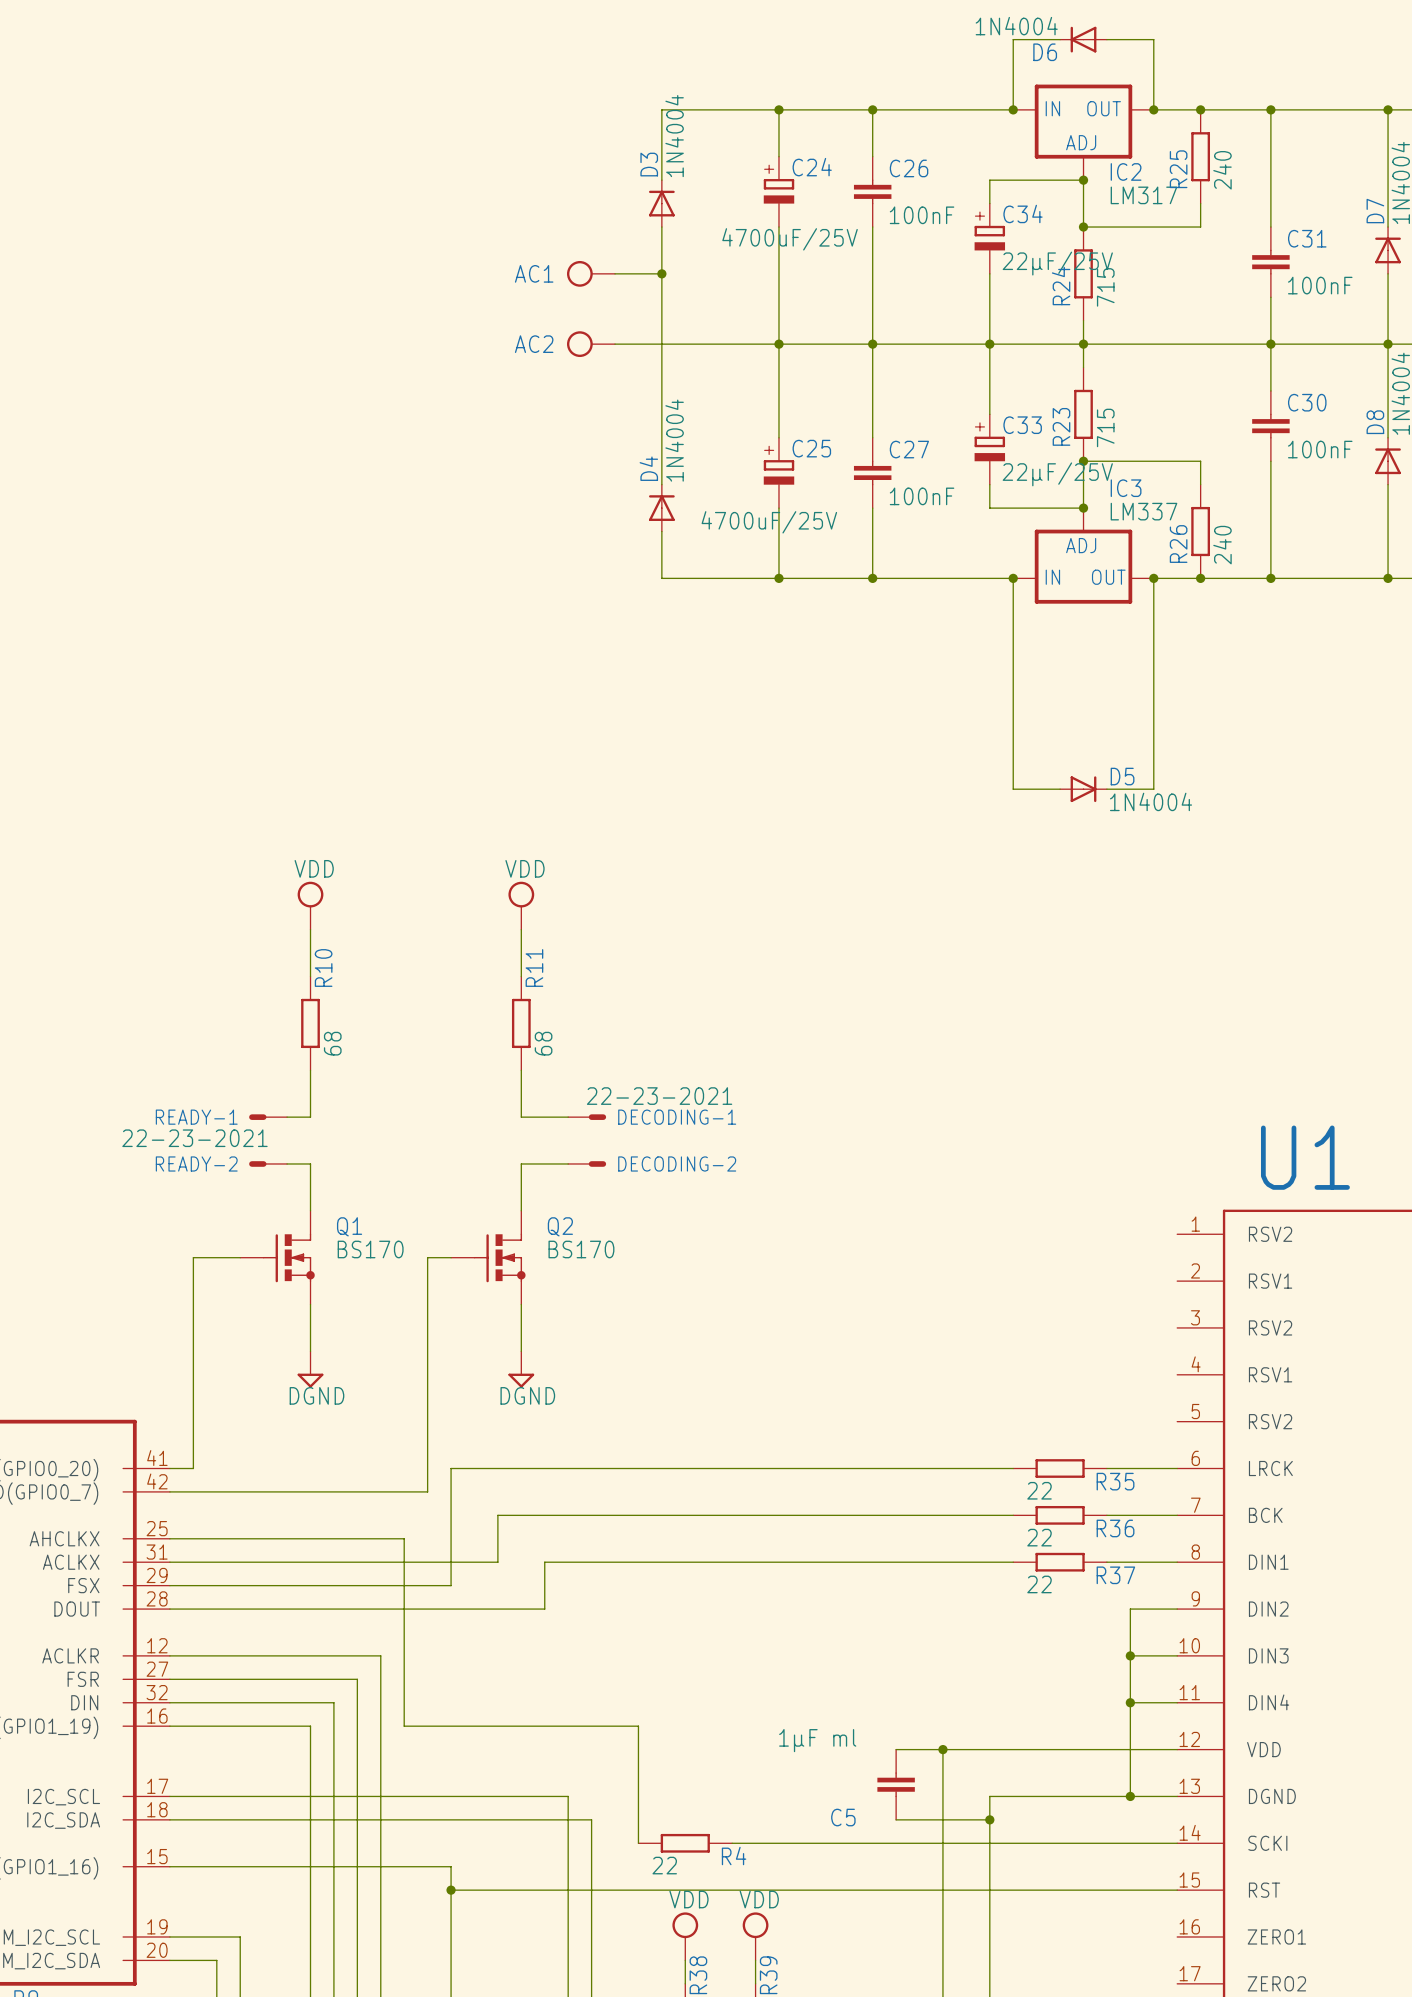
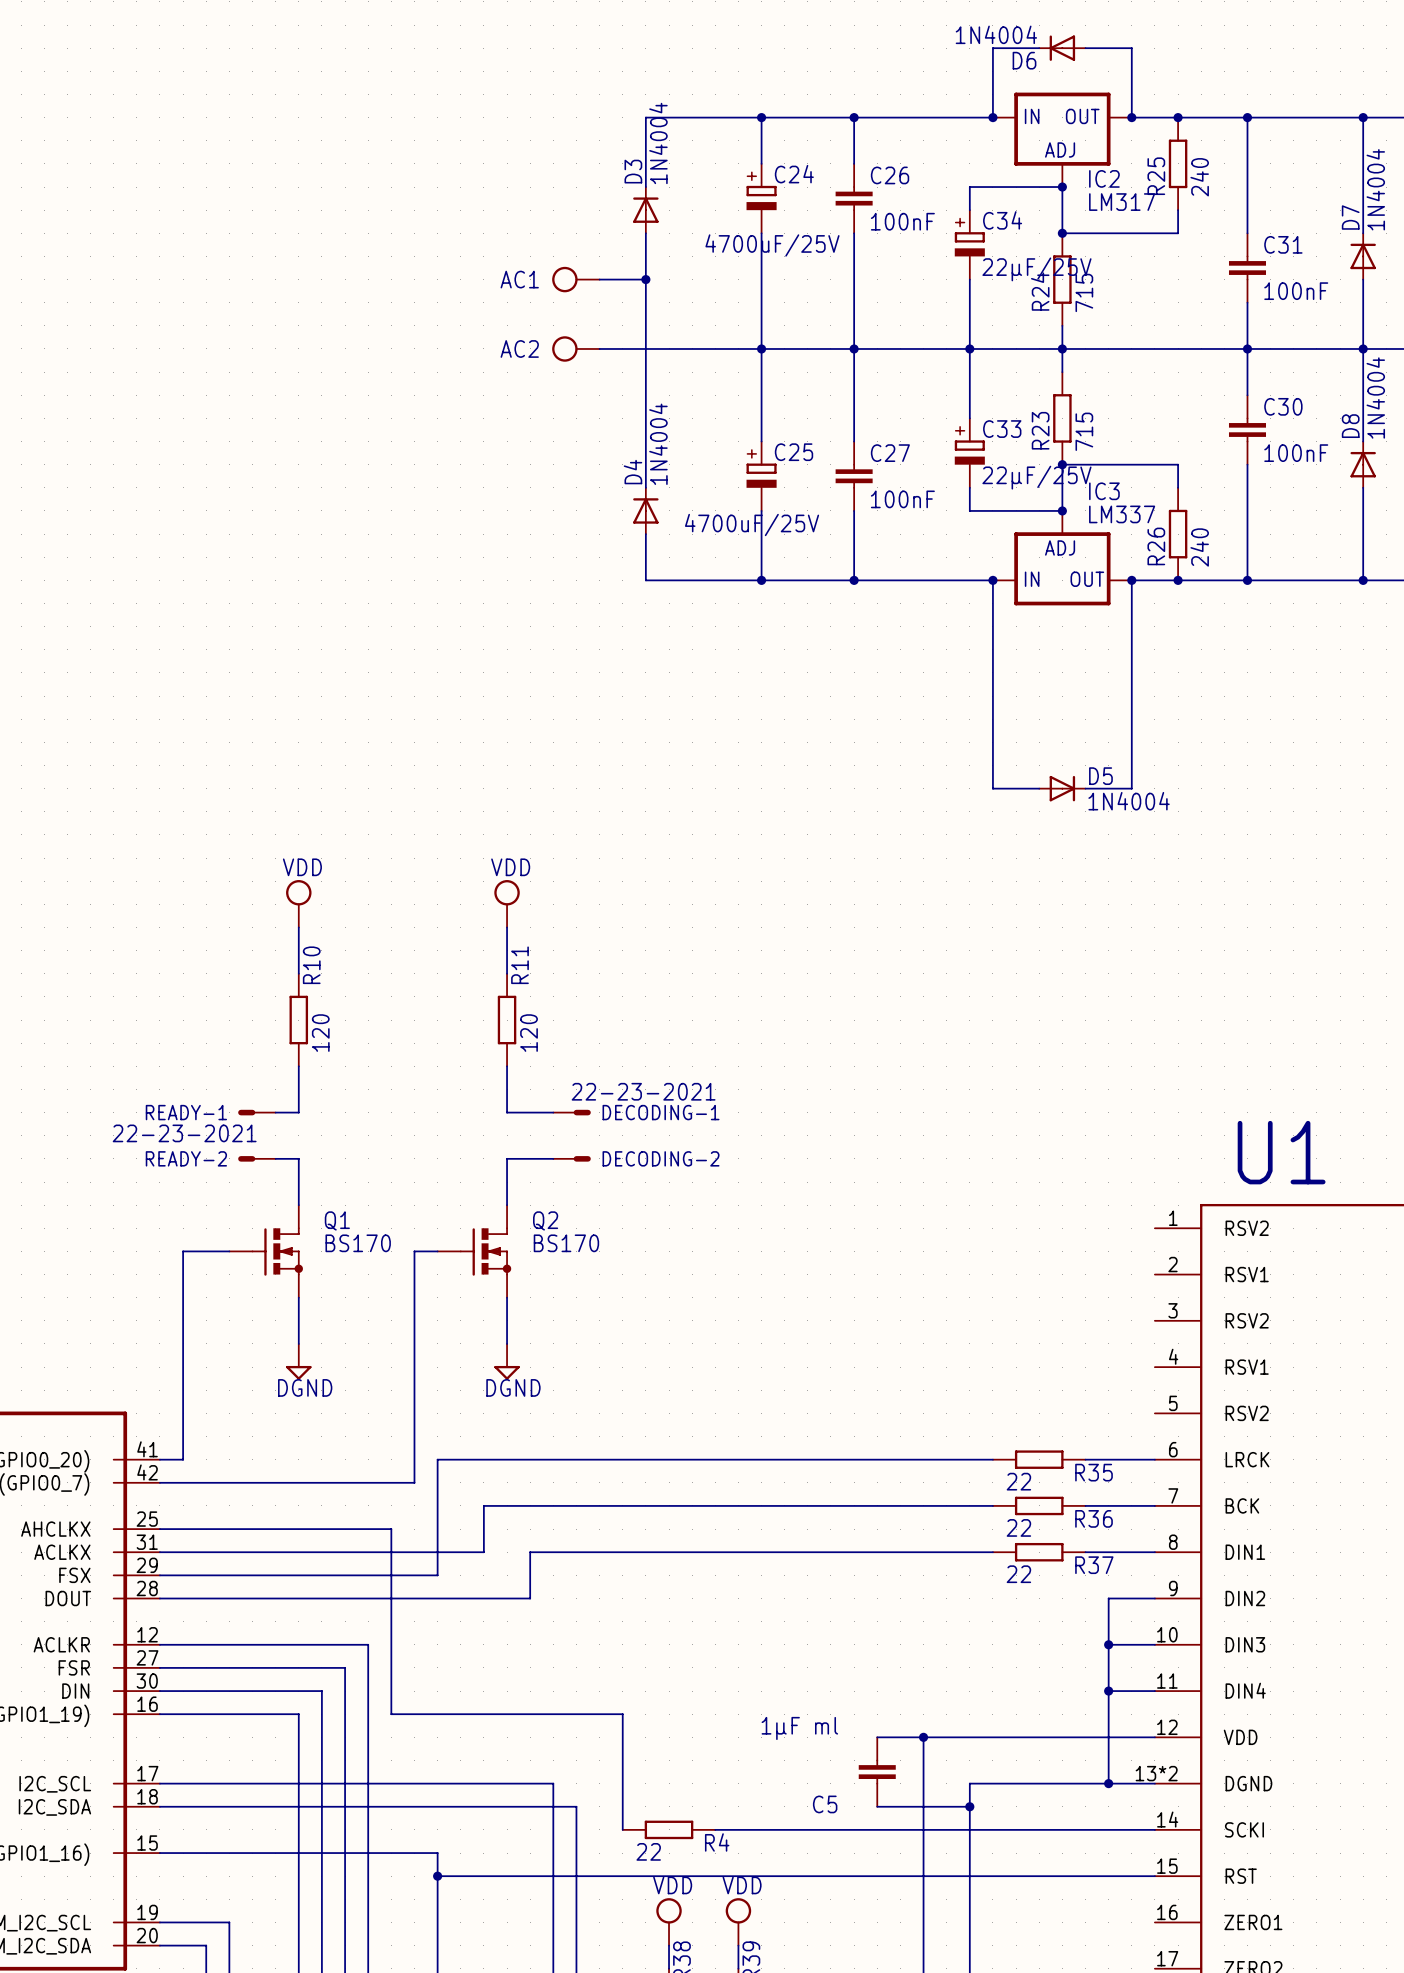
R10 value: 68 (332, 1043) -> 120 (320, 1033)
R11 value: 68 (543, 1043) -> 120 (529, 1033)
part pin number: 32 (157, 1692) -> 30 (147, 1681)
U1 pin number: 13 (1189, 1786) -> 13*2 (1156, 1773)

